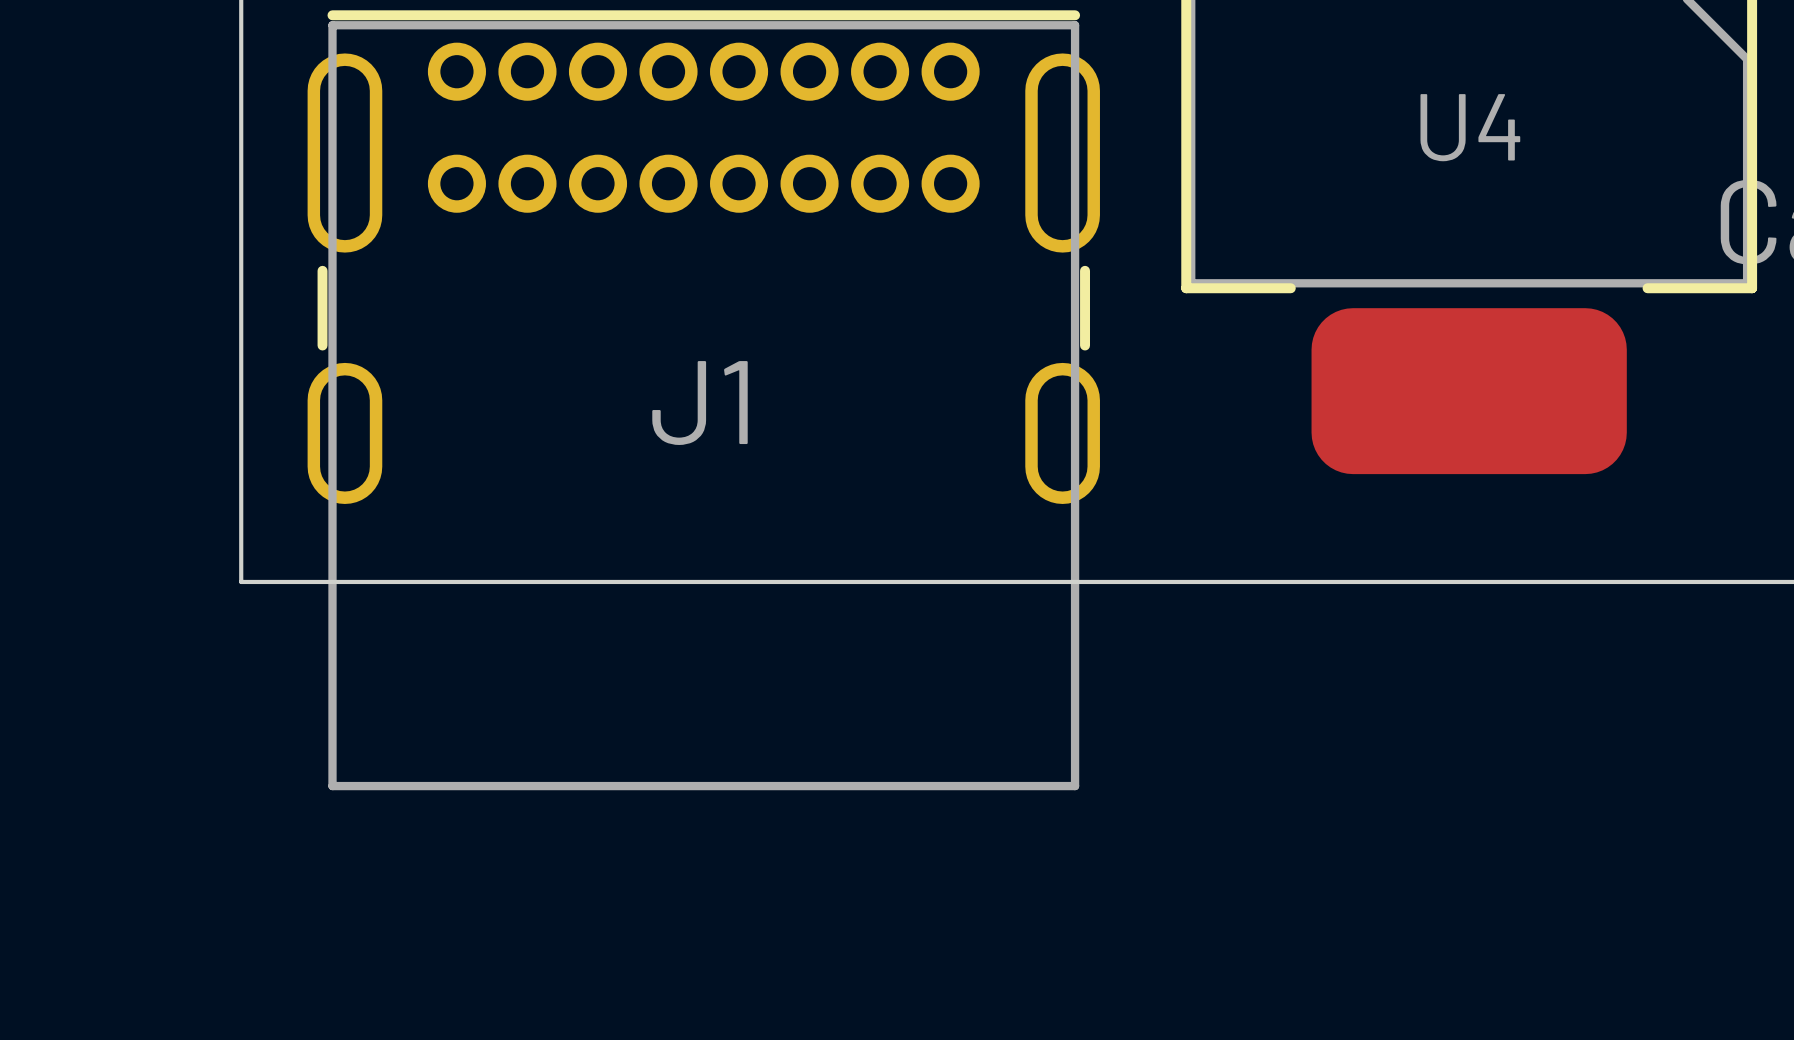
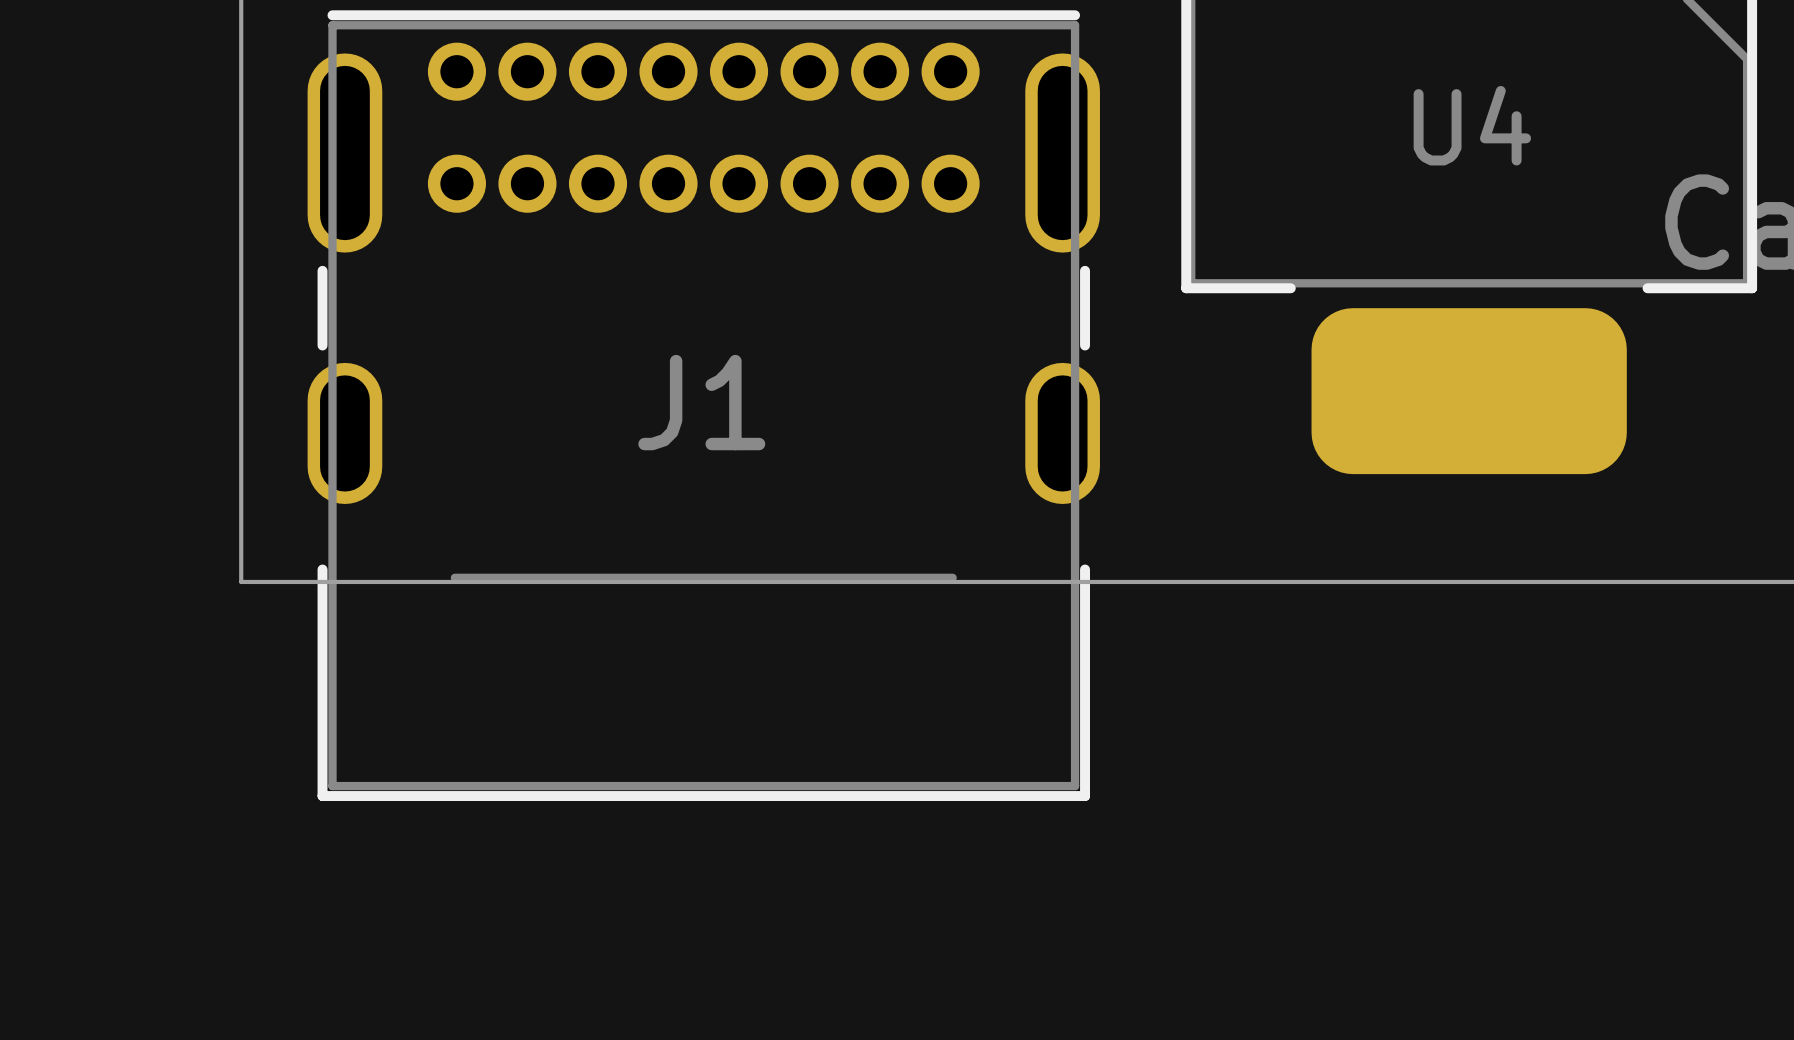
J1 footprint: [307, 10, 1100, 791] -> [307, 10, 1100, 802]

